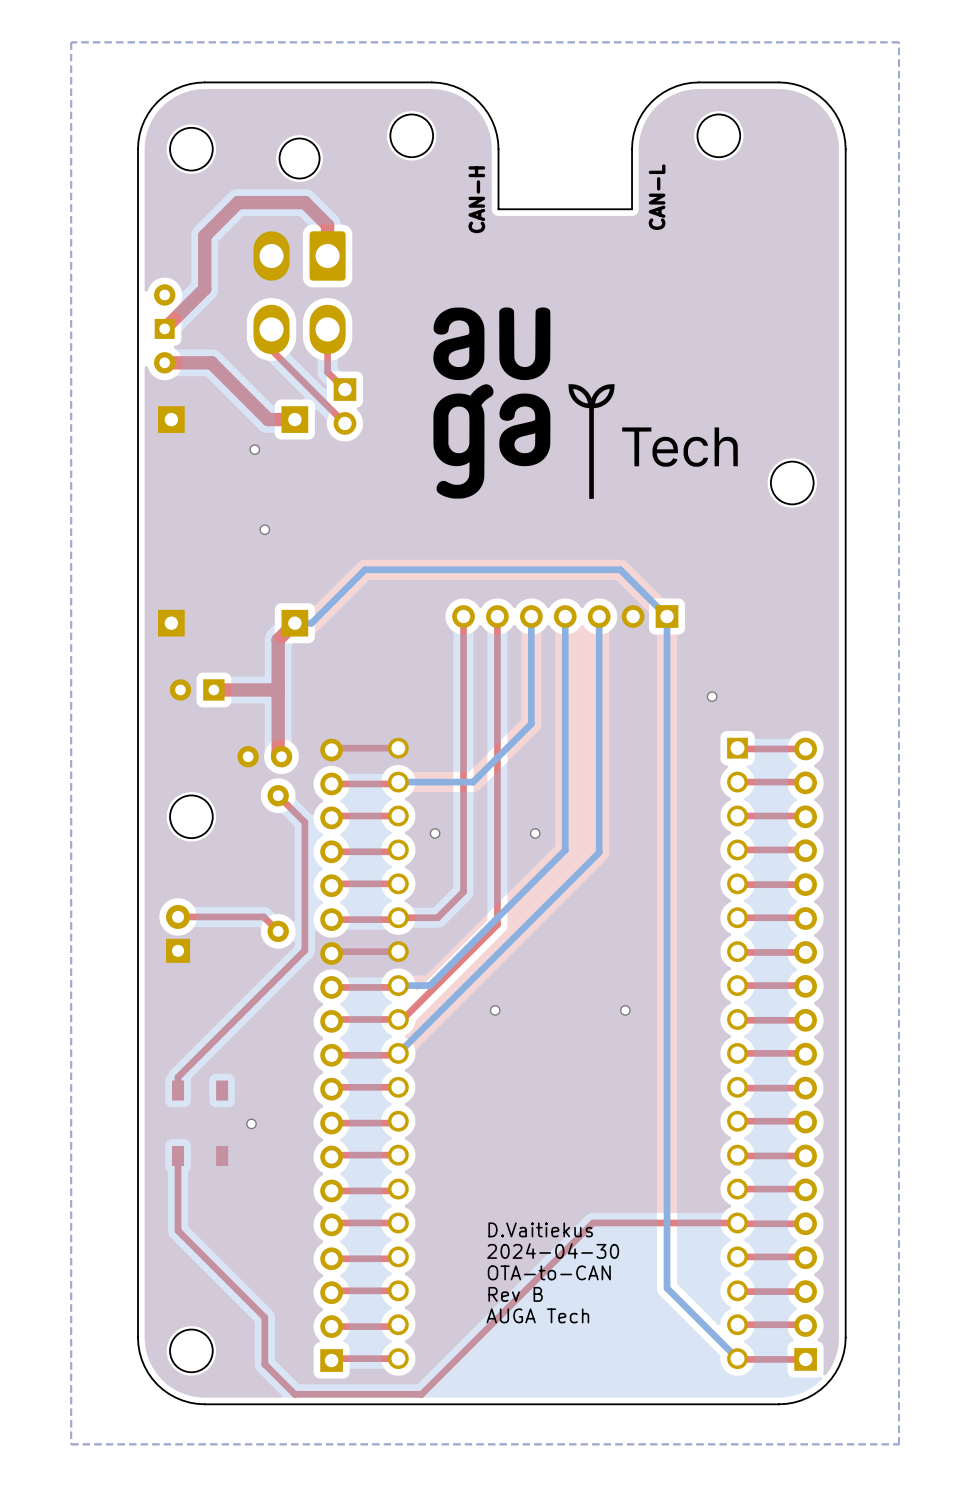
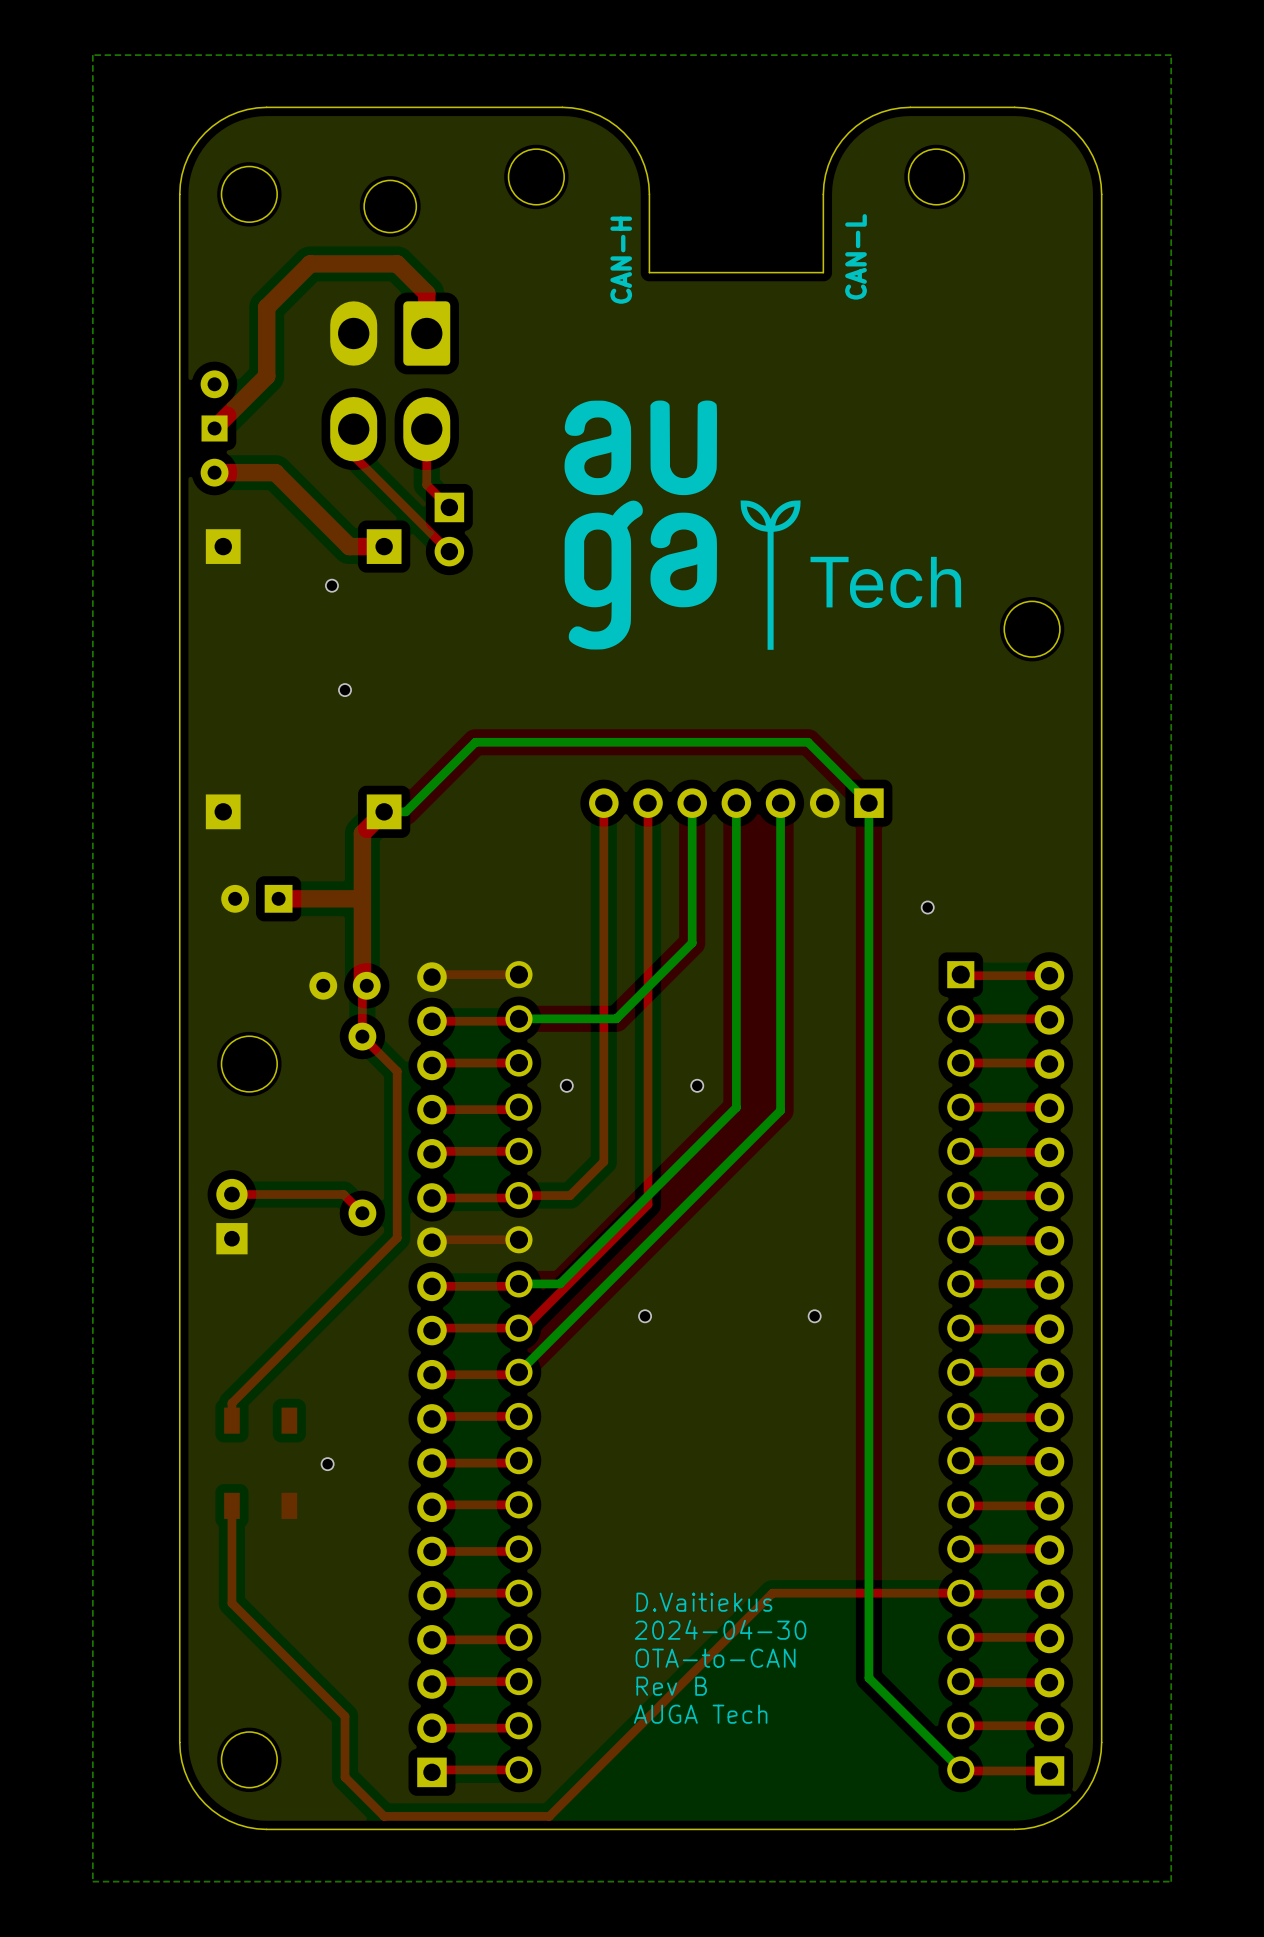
top track: none -> (366, 985) (362, 990) (362, 1036)

